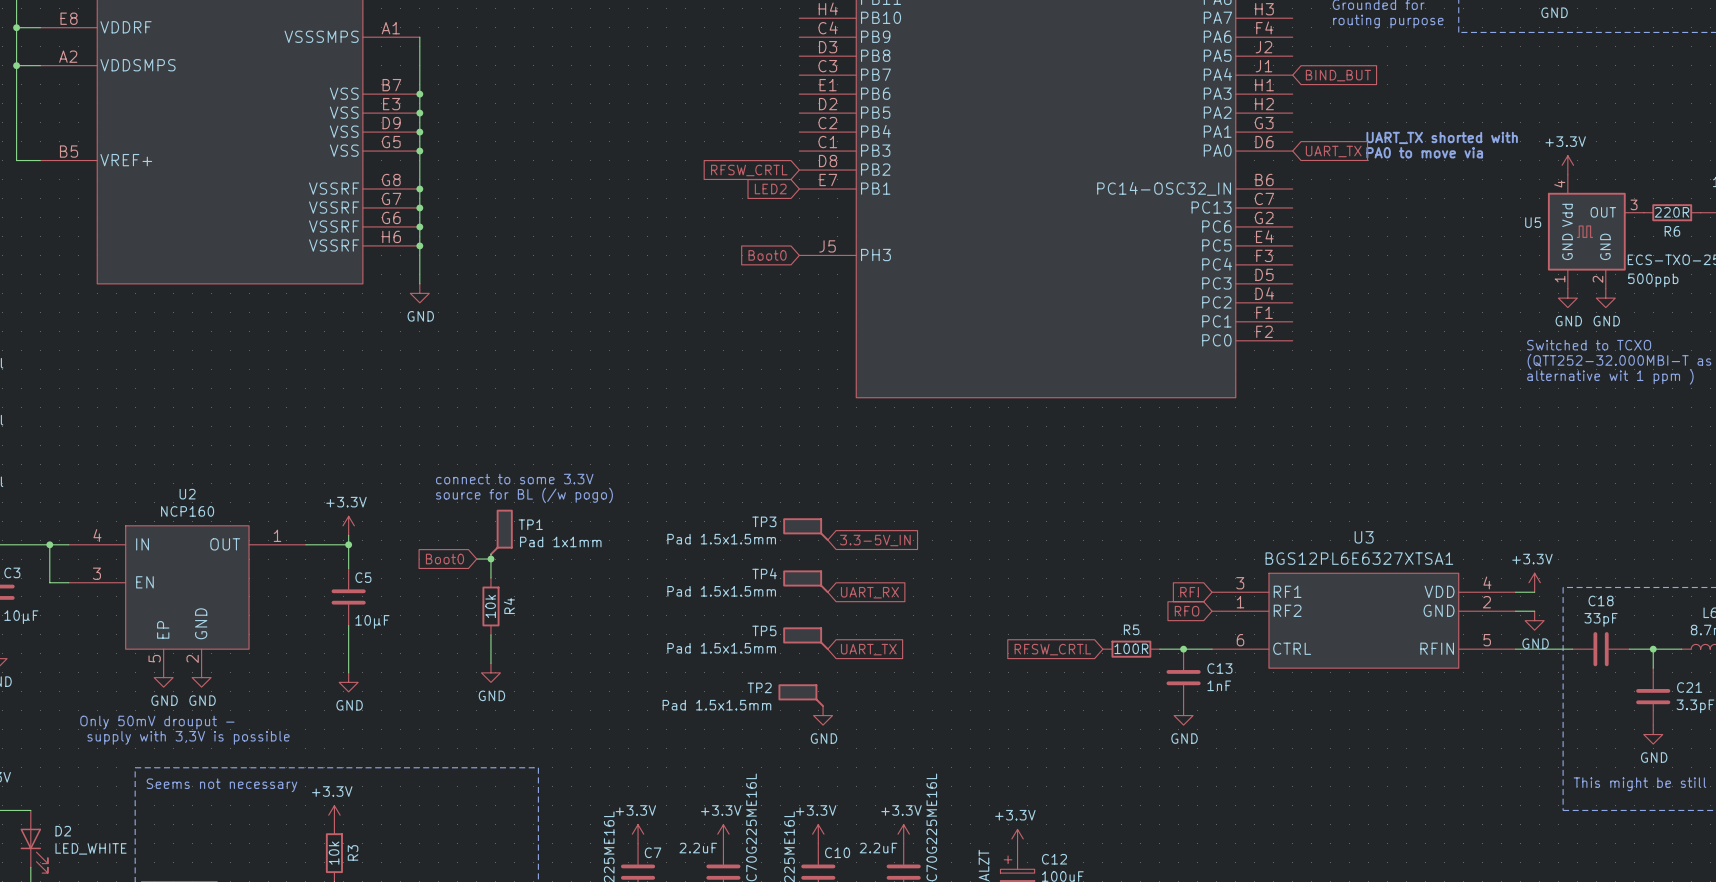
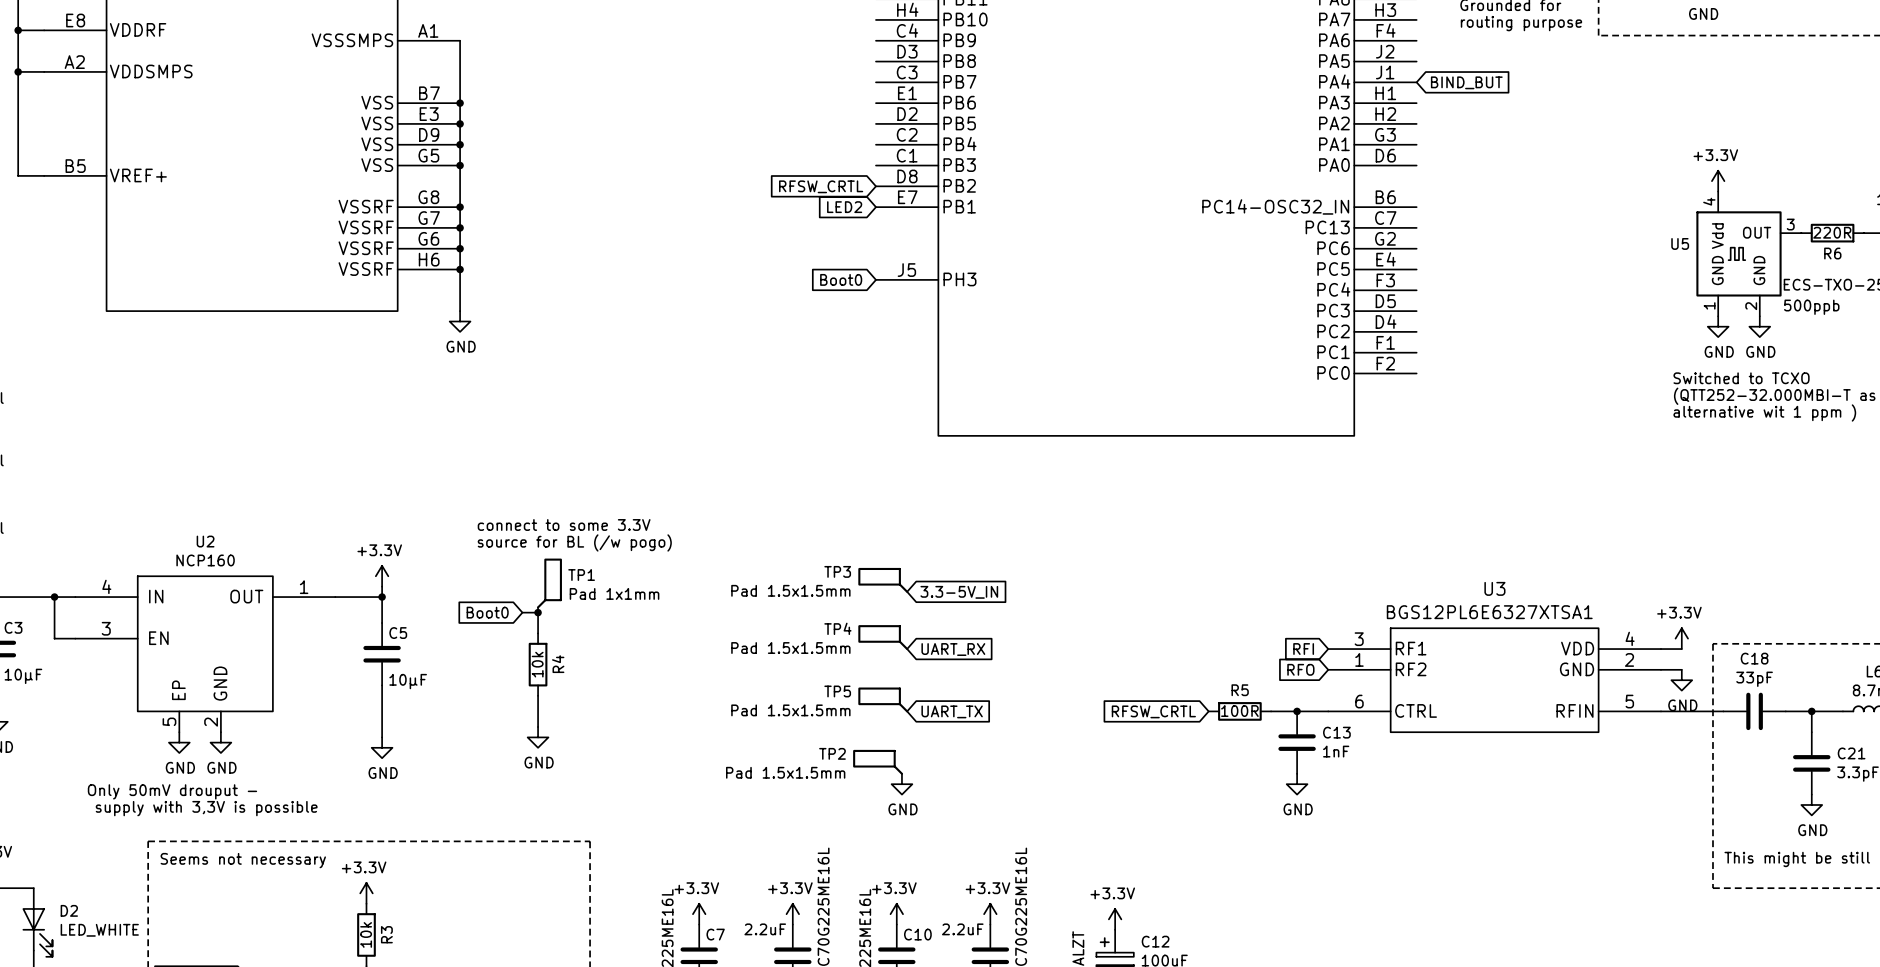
text: UART_TX shorted with (1442, 137) -> none
global label: UART_TX (1333, 151) -> none
text: PA0 to move via (1424, 152) -> none

